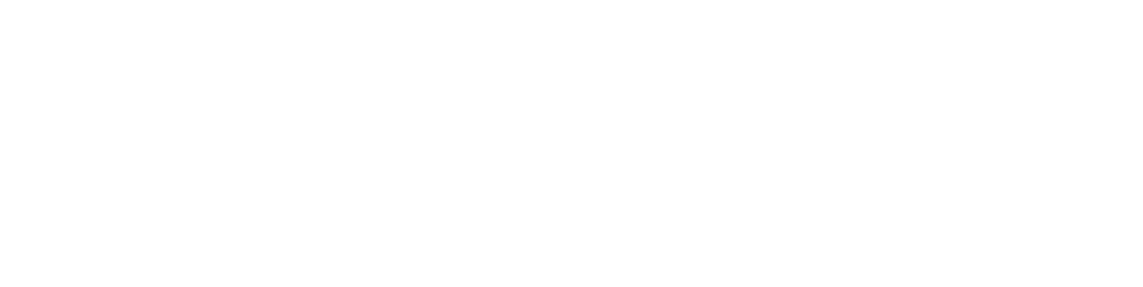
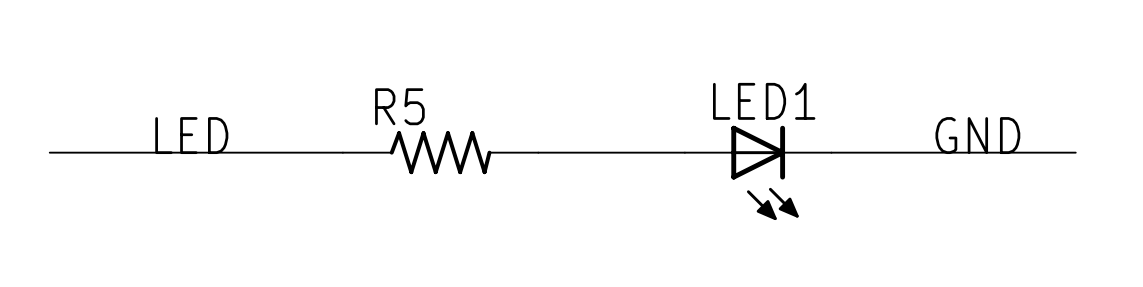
label: none -> LED (191, 135)
label: none -> GND (977, 135)
wire: none -> (49, 152) (342, 152)
R5: none -> (440, 152)
wire: none -> (538, 152) (684, 152)
wire: none -> (831, 152) (1075, 152)
LED1: none -> (758, 172)

